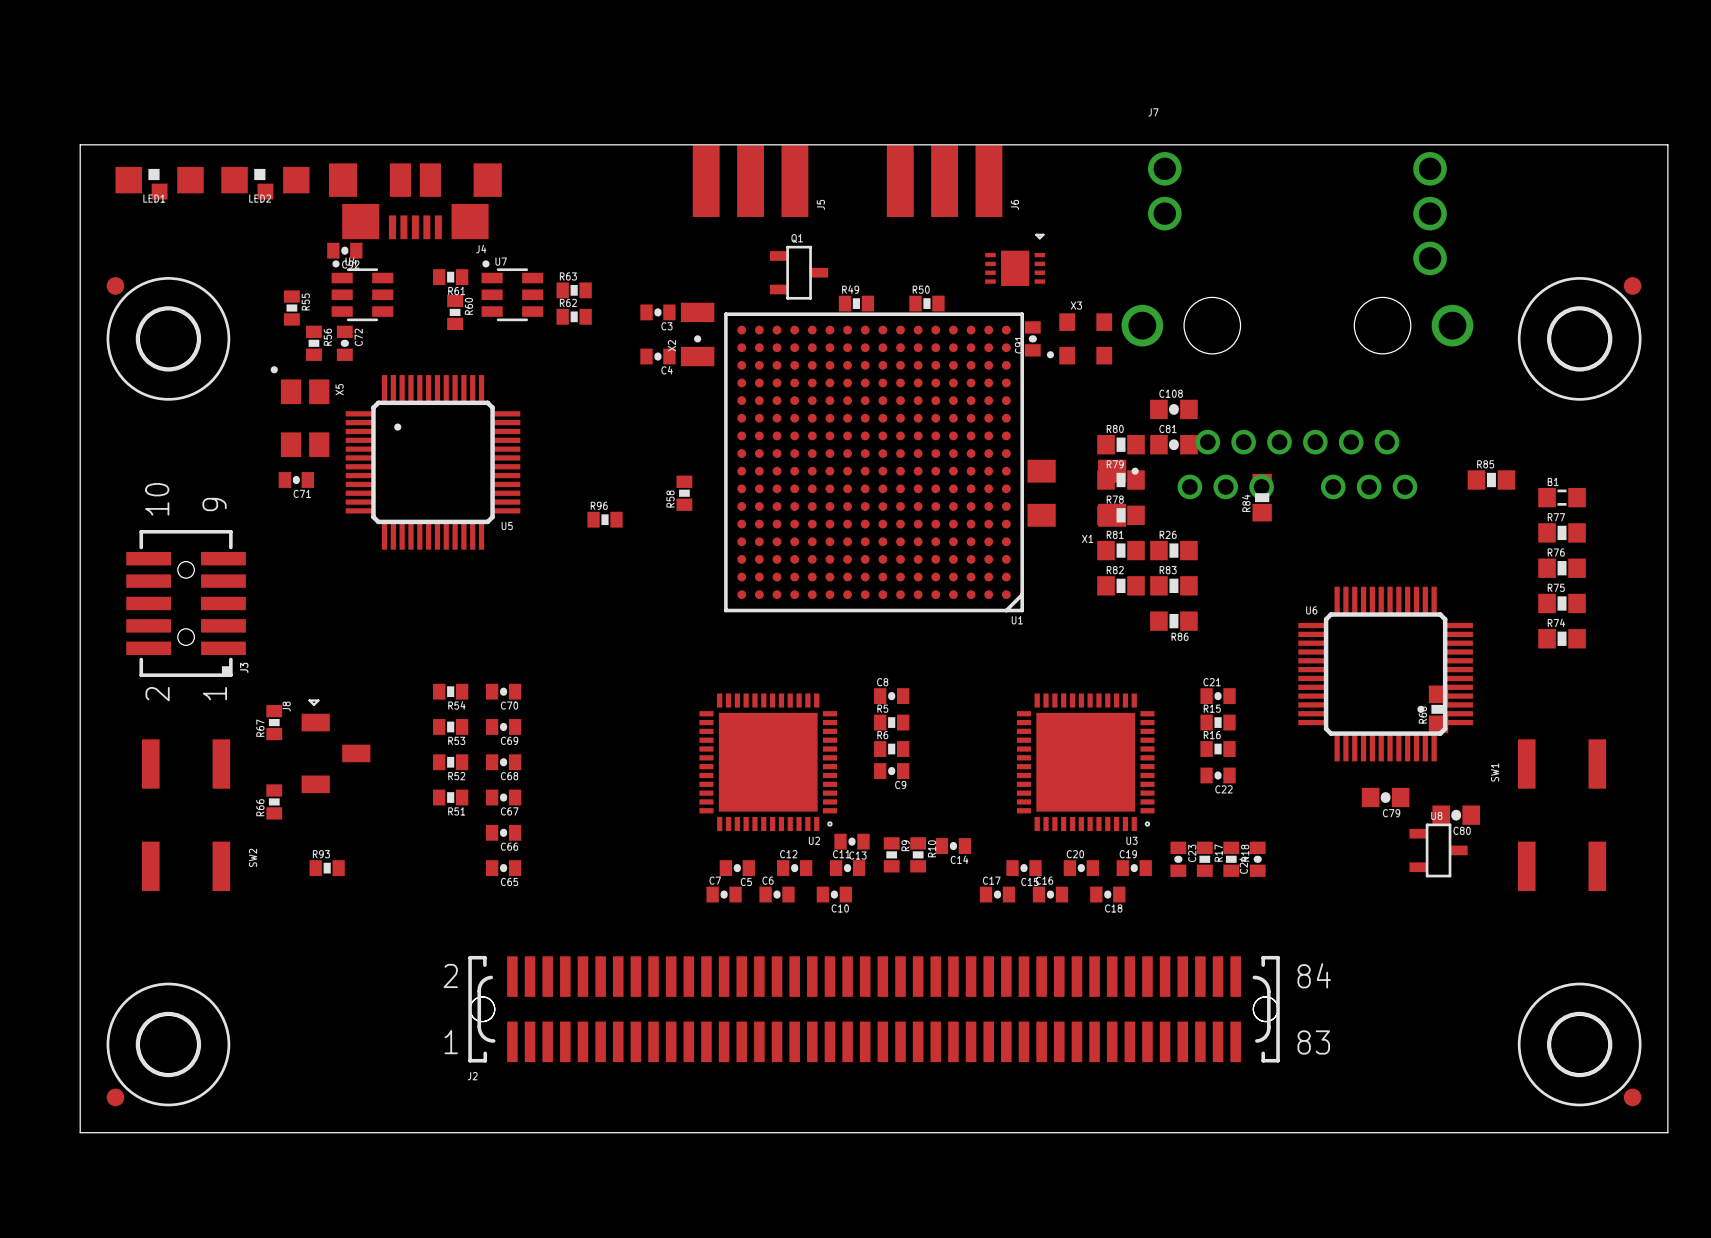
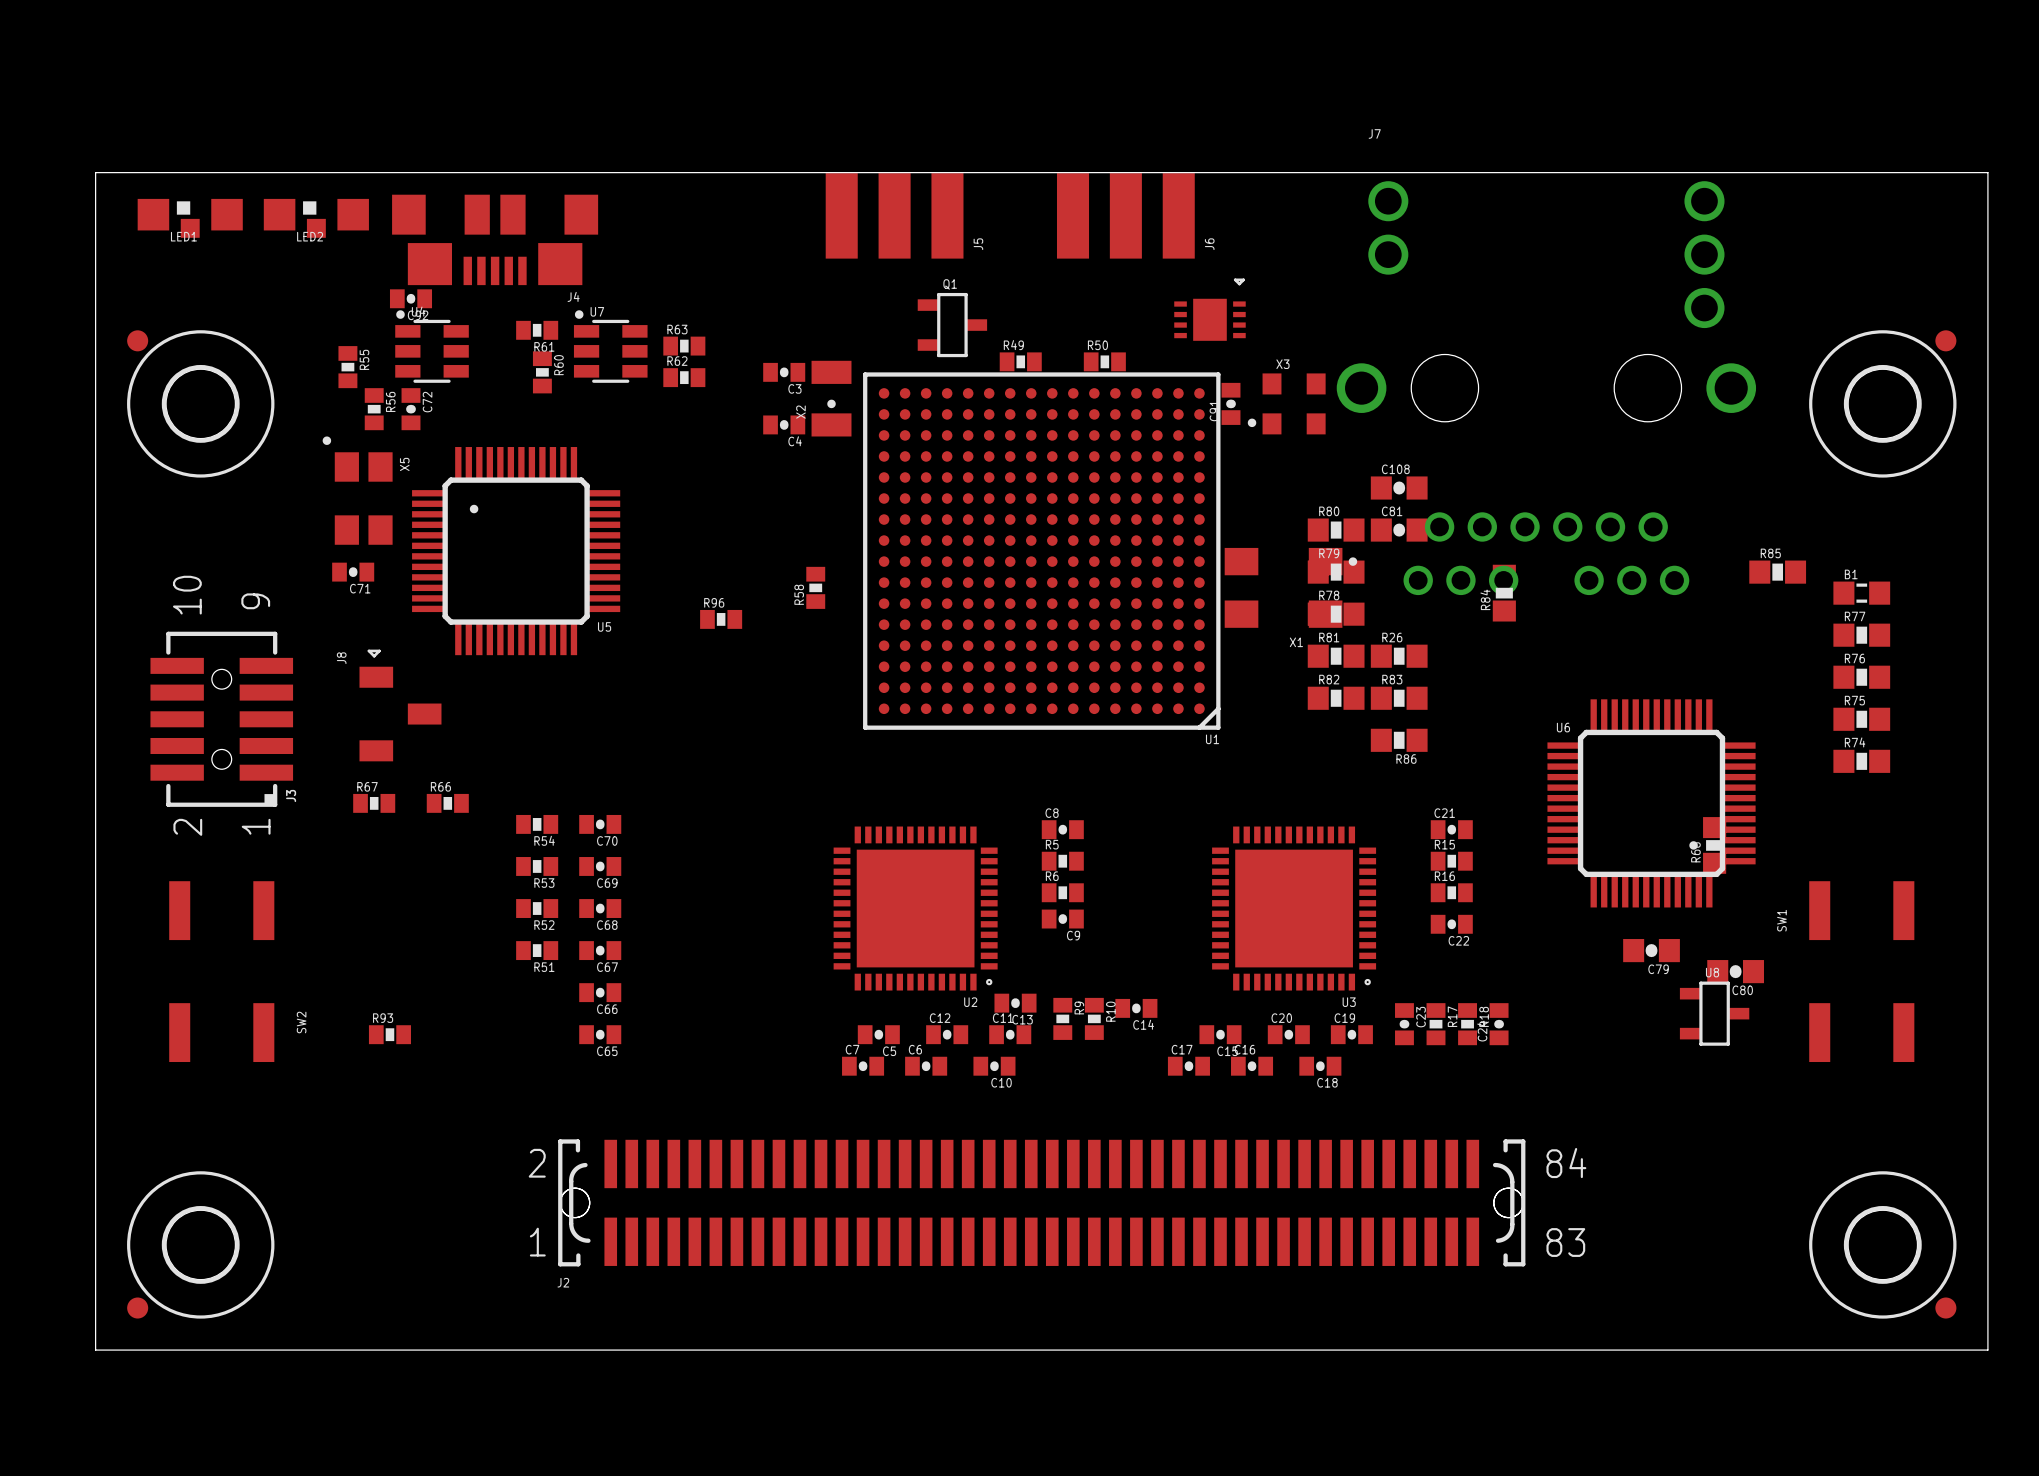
R67 rotation: 0° (274, 722) -> 90° clockwise (374, 803)
R67 position: (274, 722) -> (374, 803)
J8 position: (336, 746) -> (400, 705)
R66 rotation: 0° (274, 801) -> 90° clockwise (447, 803)
R66 position: (274, 801) -> (447, 803)

